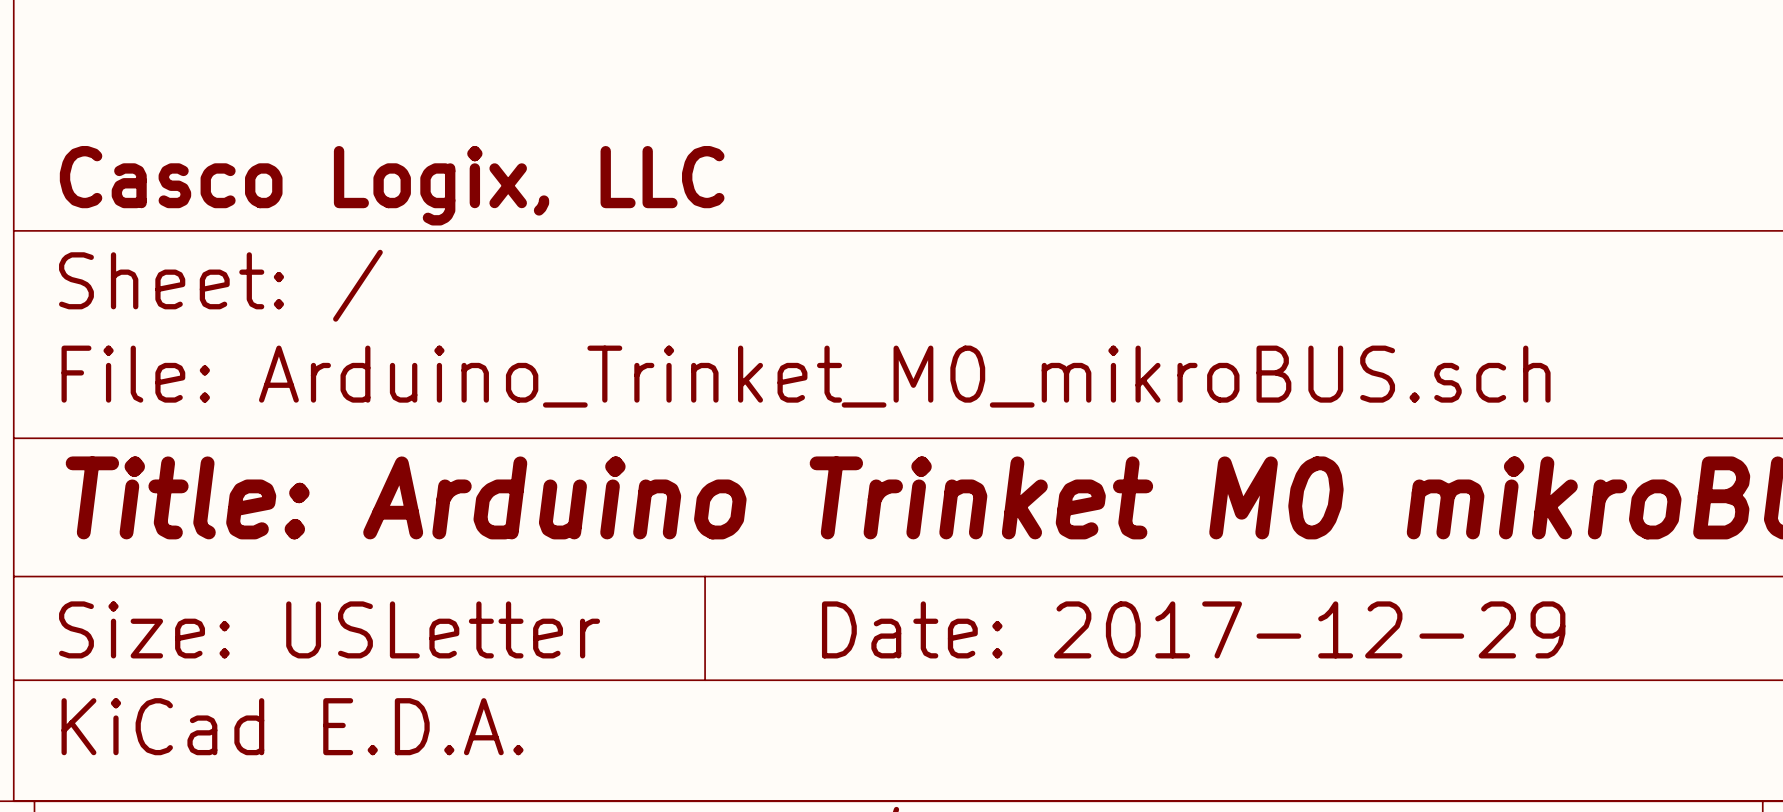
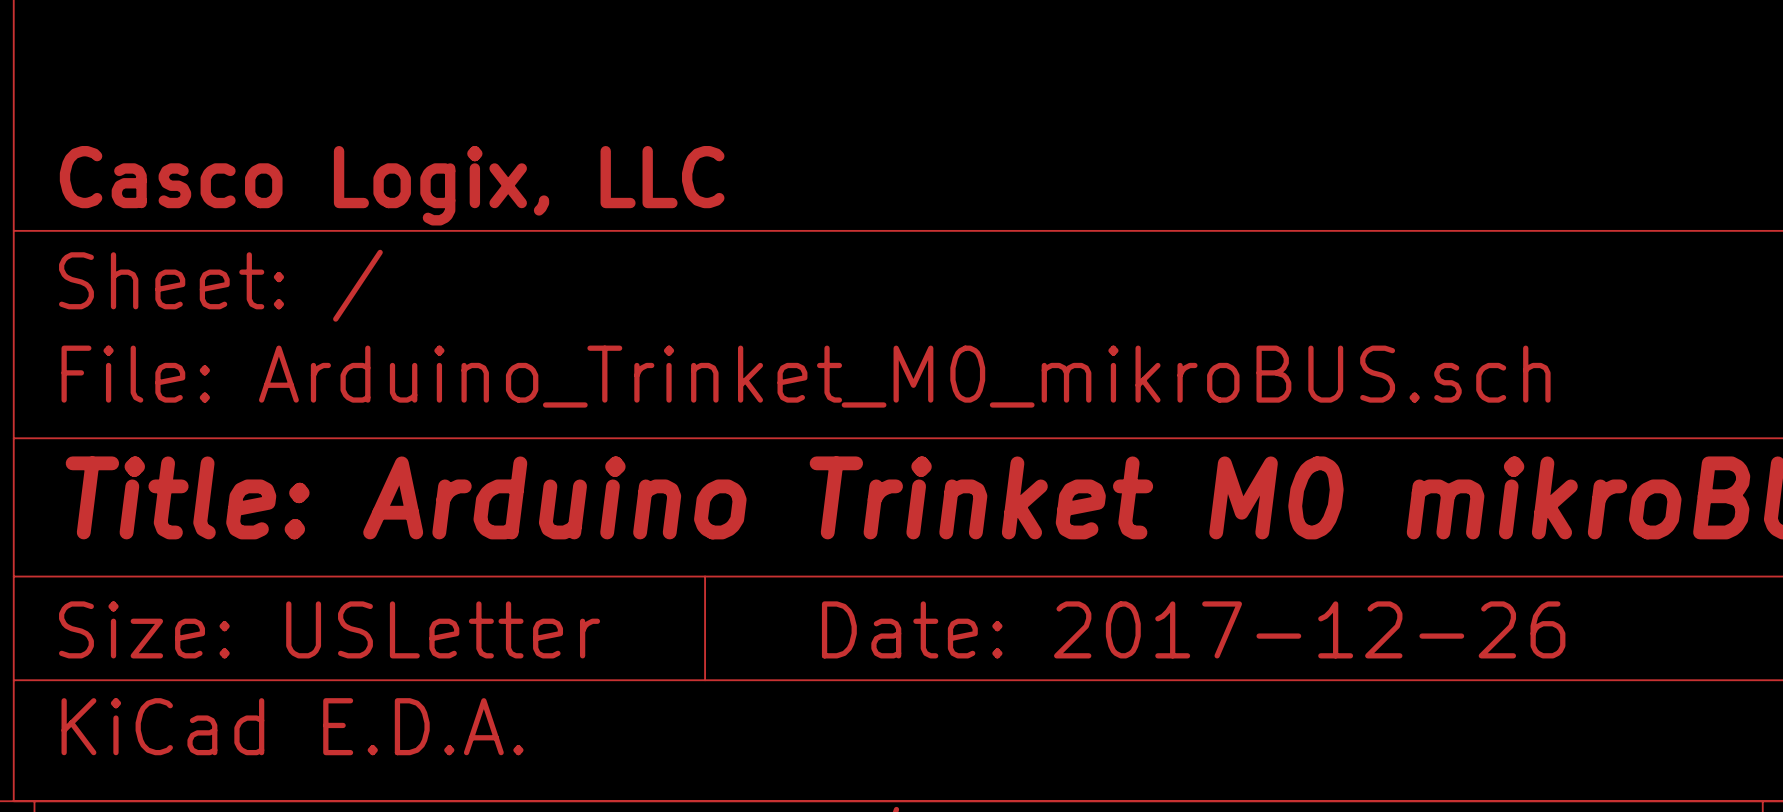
title block: Date: 2017-12-29 (1193, 629) -> Date: 2017-12-26 (1193, 629)

